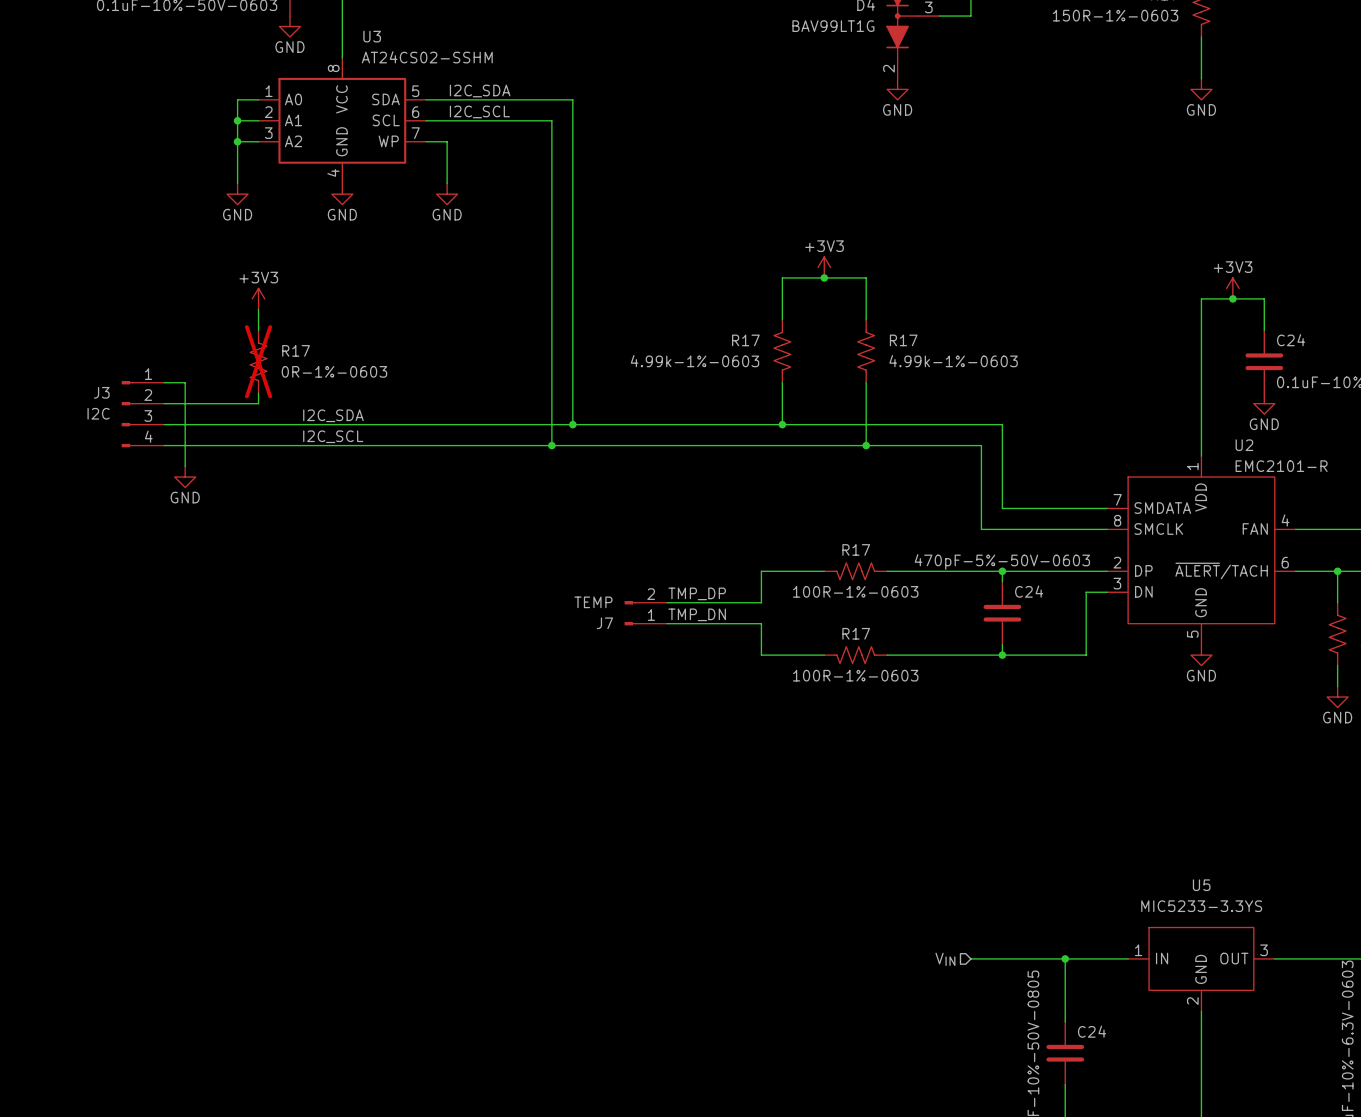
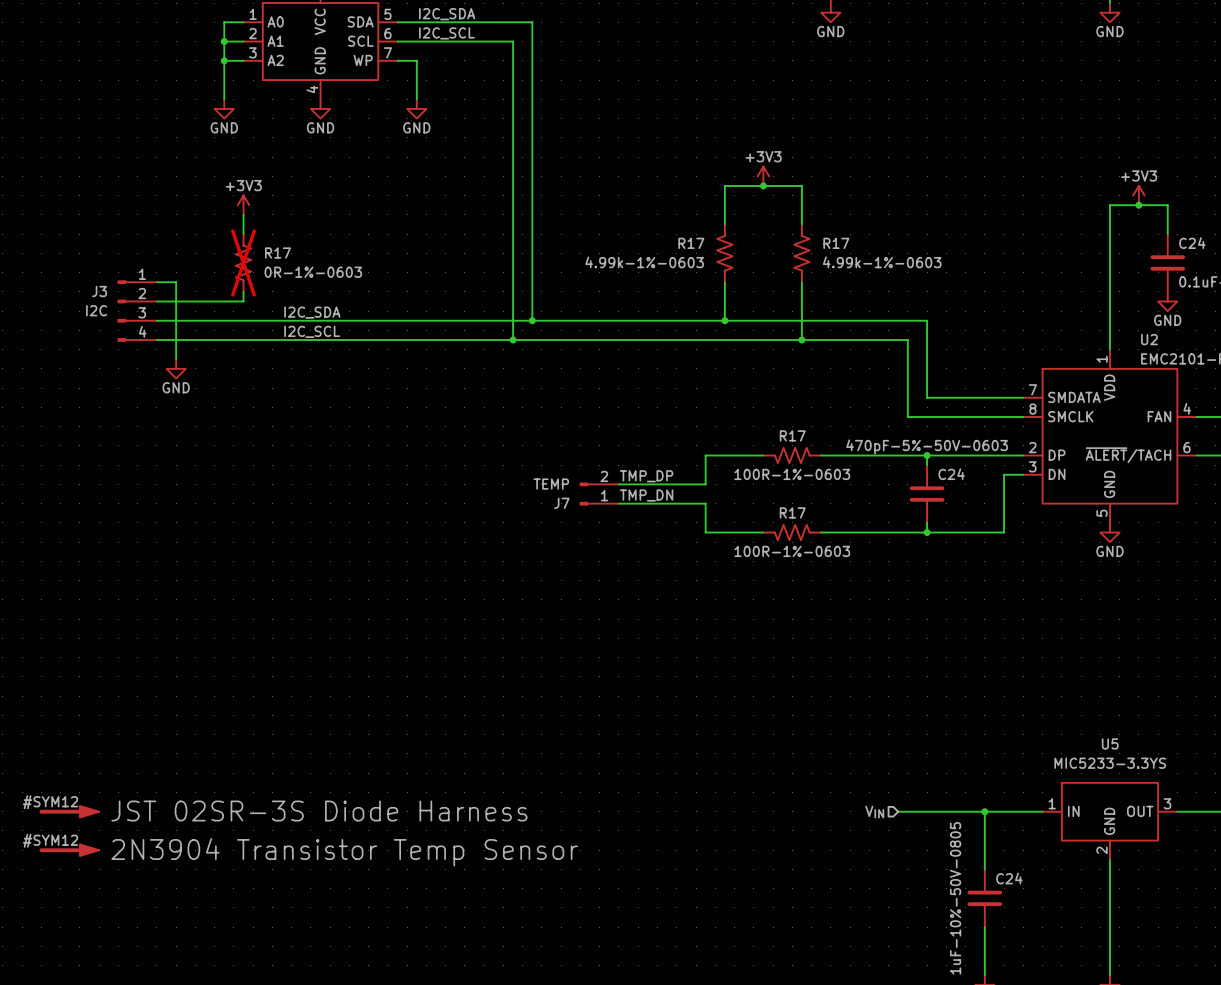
#SYM12: none -> JST 02SR-3S Diode Harness (69, 811)
#SYM12: none -> 2N3904 Transistor Temp Sensor (69, 850)

